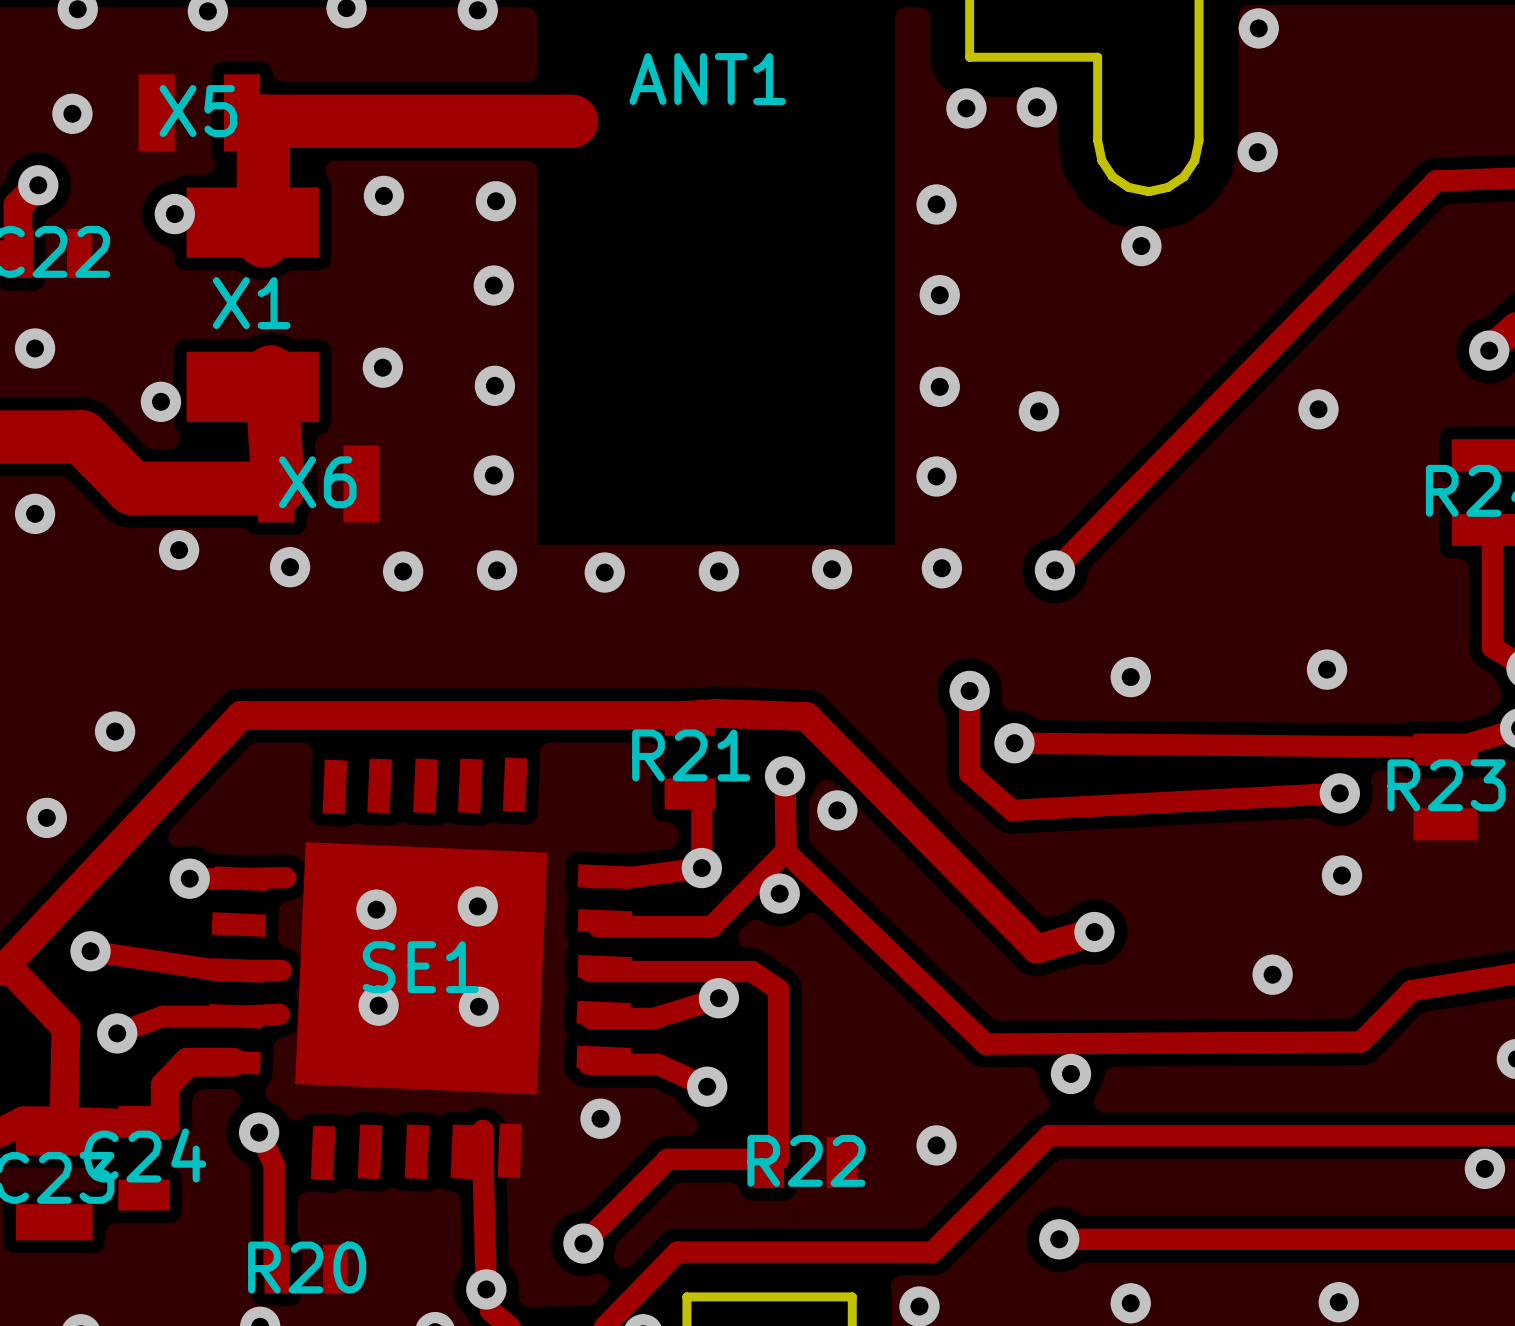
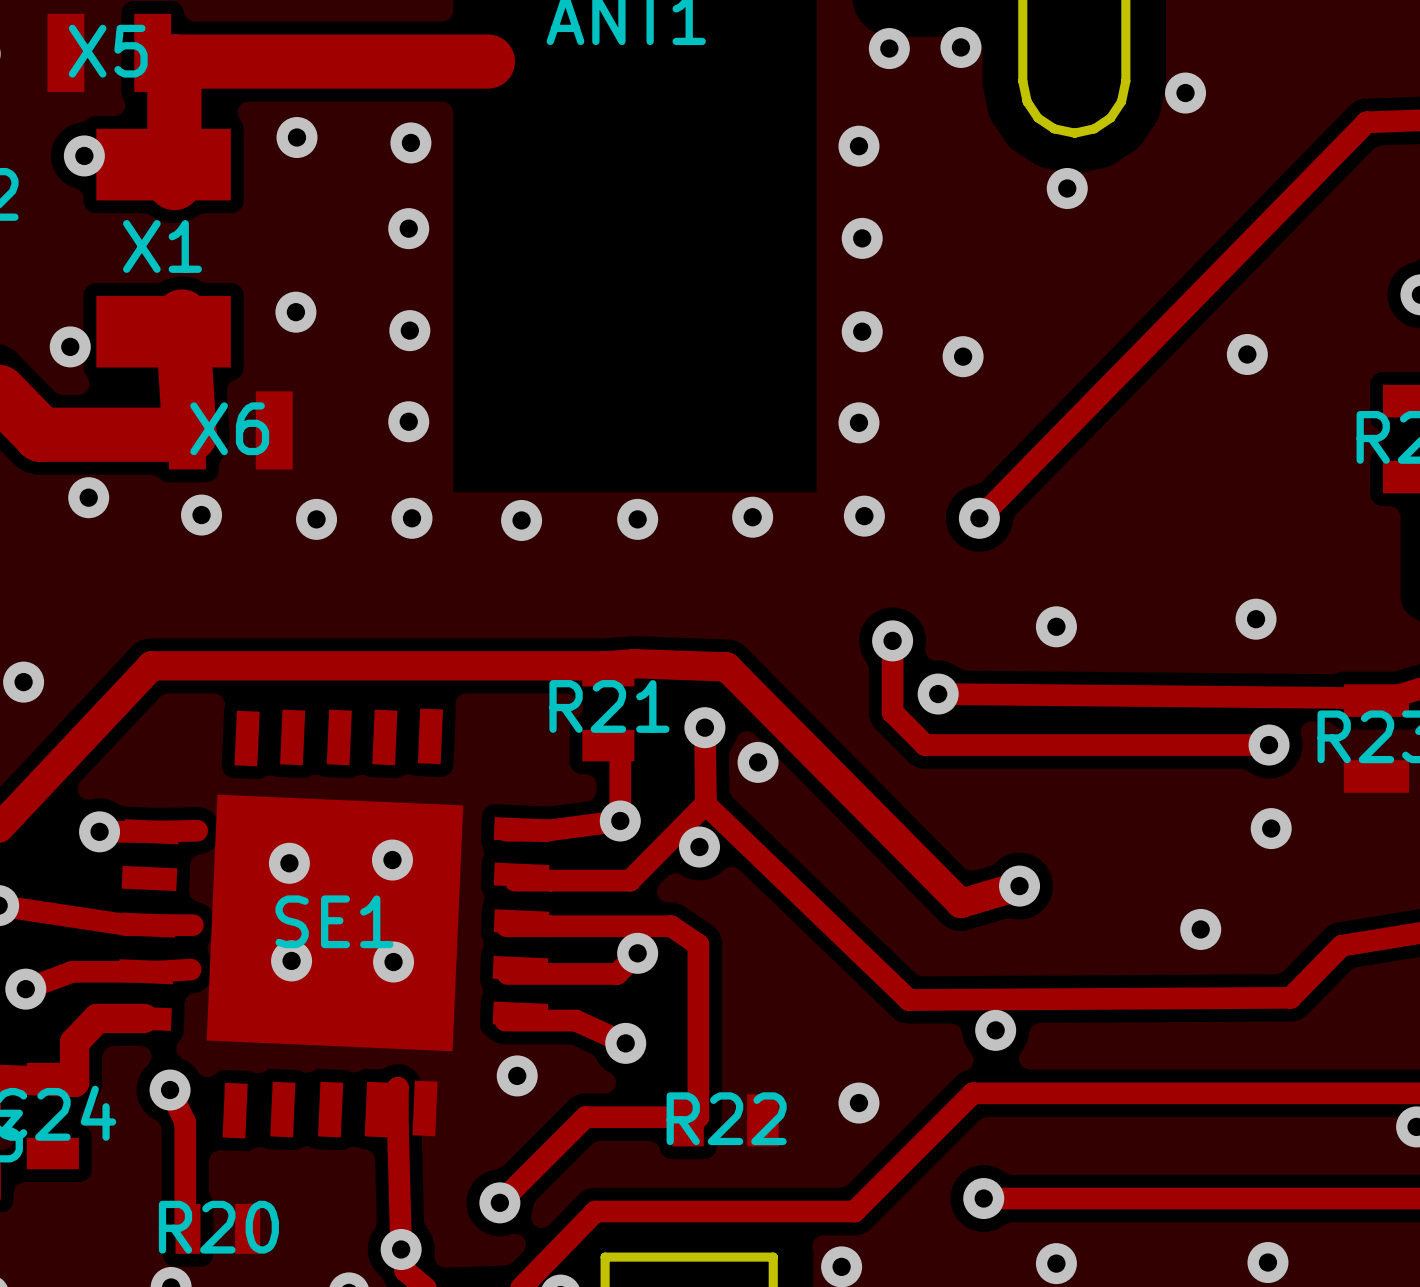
track: (969, 761) (969, 773) (1012, 810) (1339, 793) -> (892, 712) (925, 745) (1269, 745)
track: (718, 998) (653, 1018) -> (637, 953) (617, 973) (571, 973)

